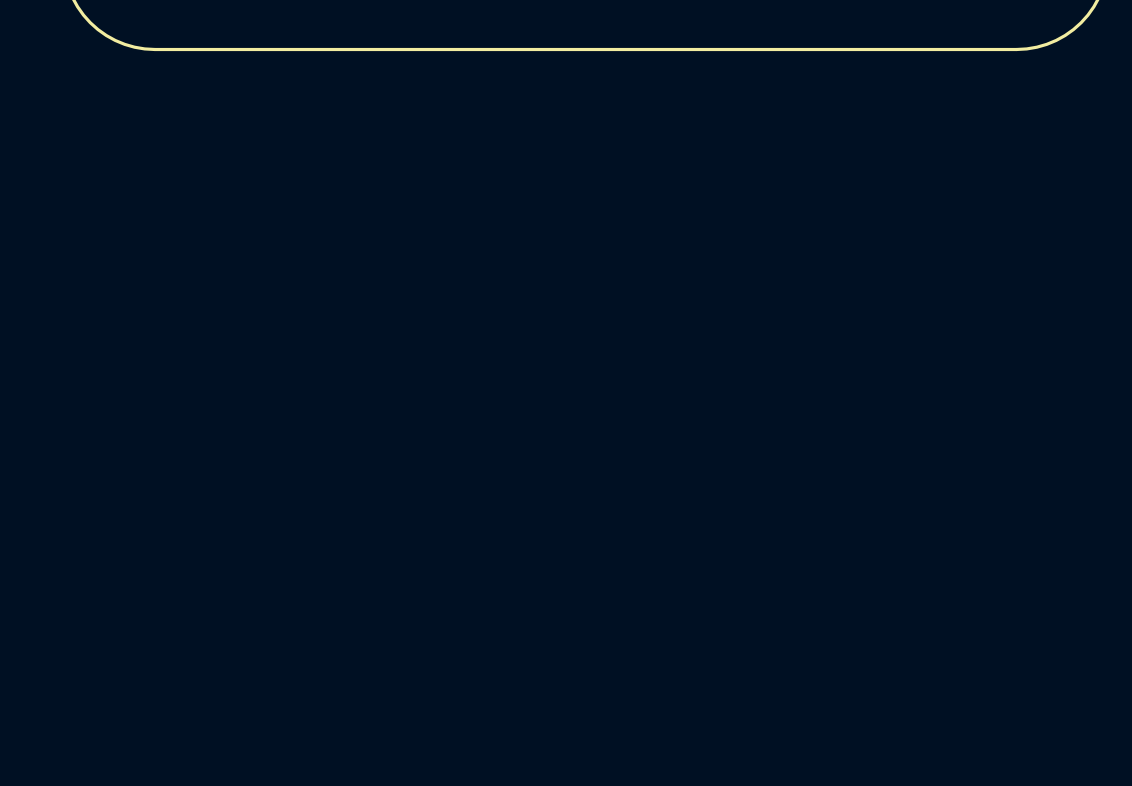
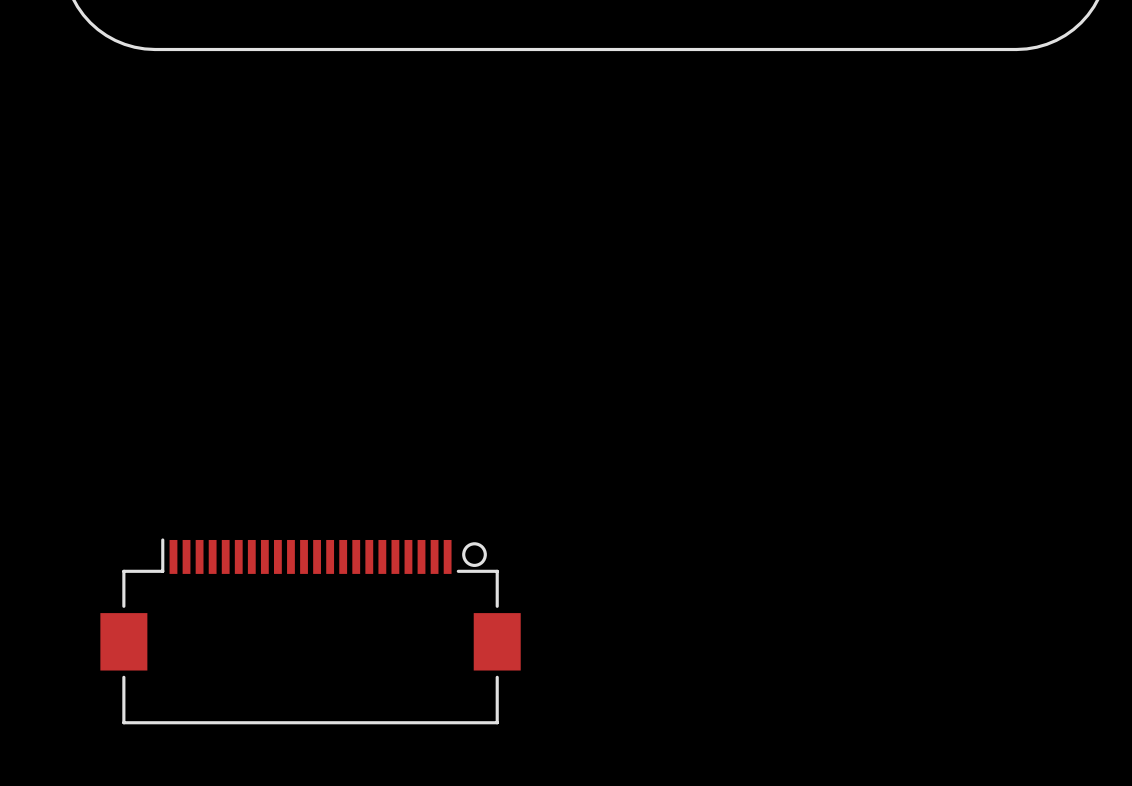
part: none -> (310, 631)

